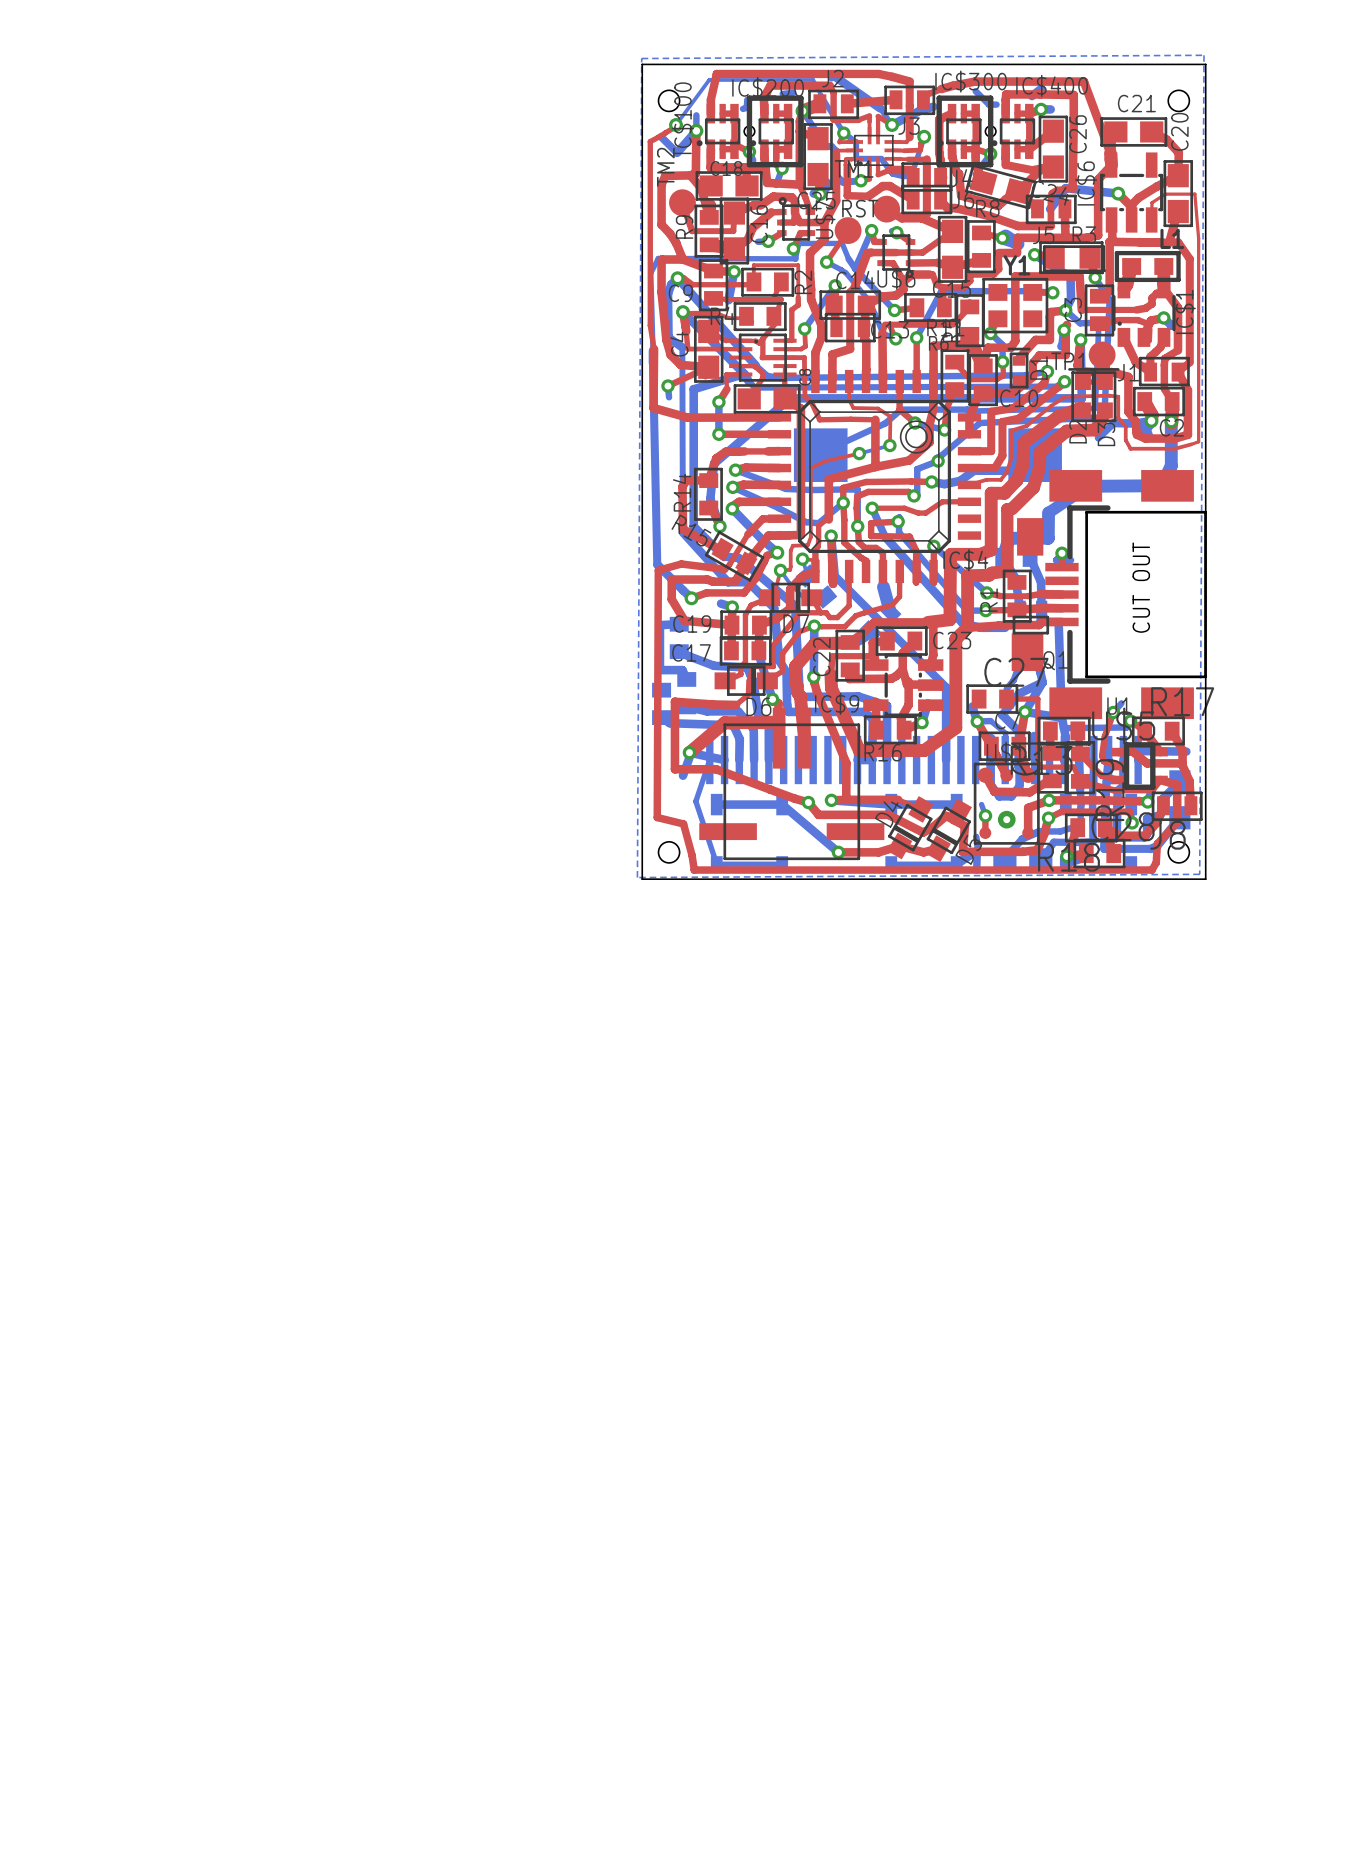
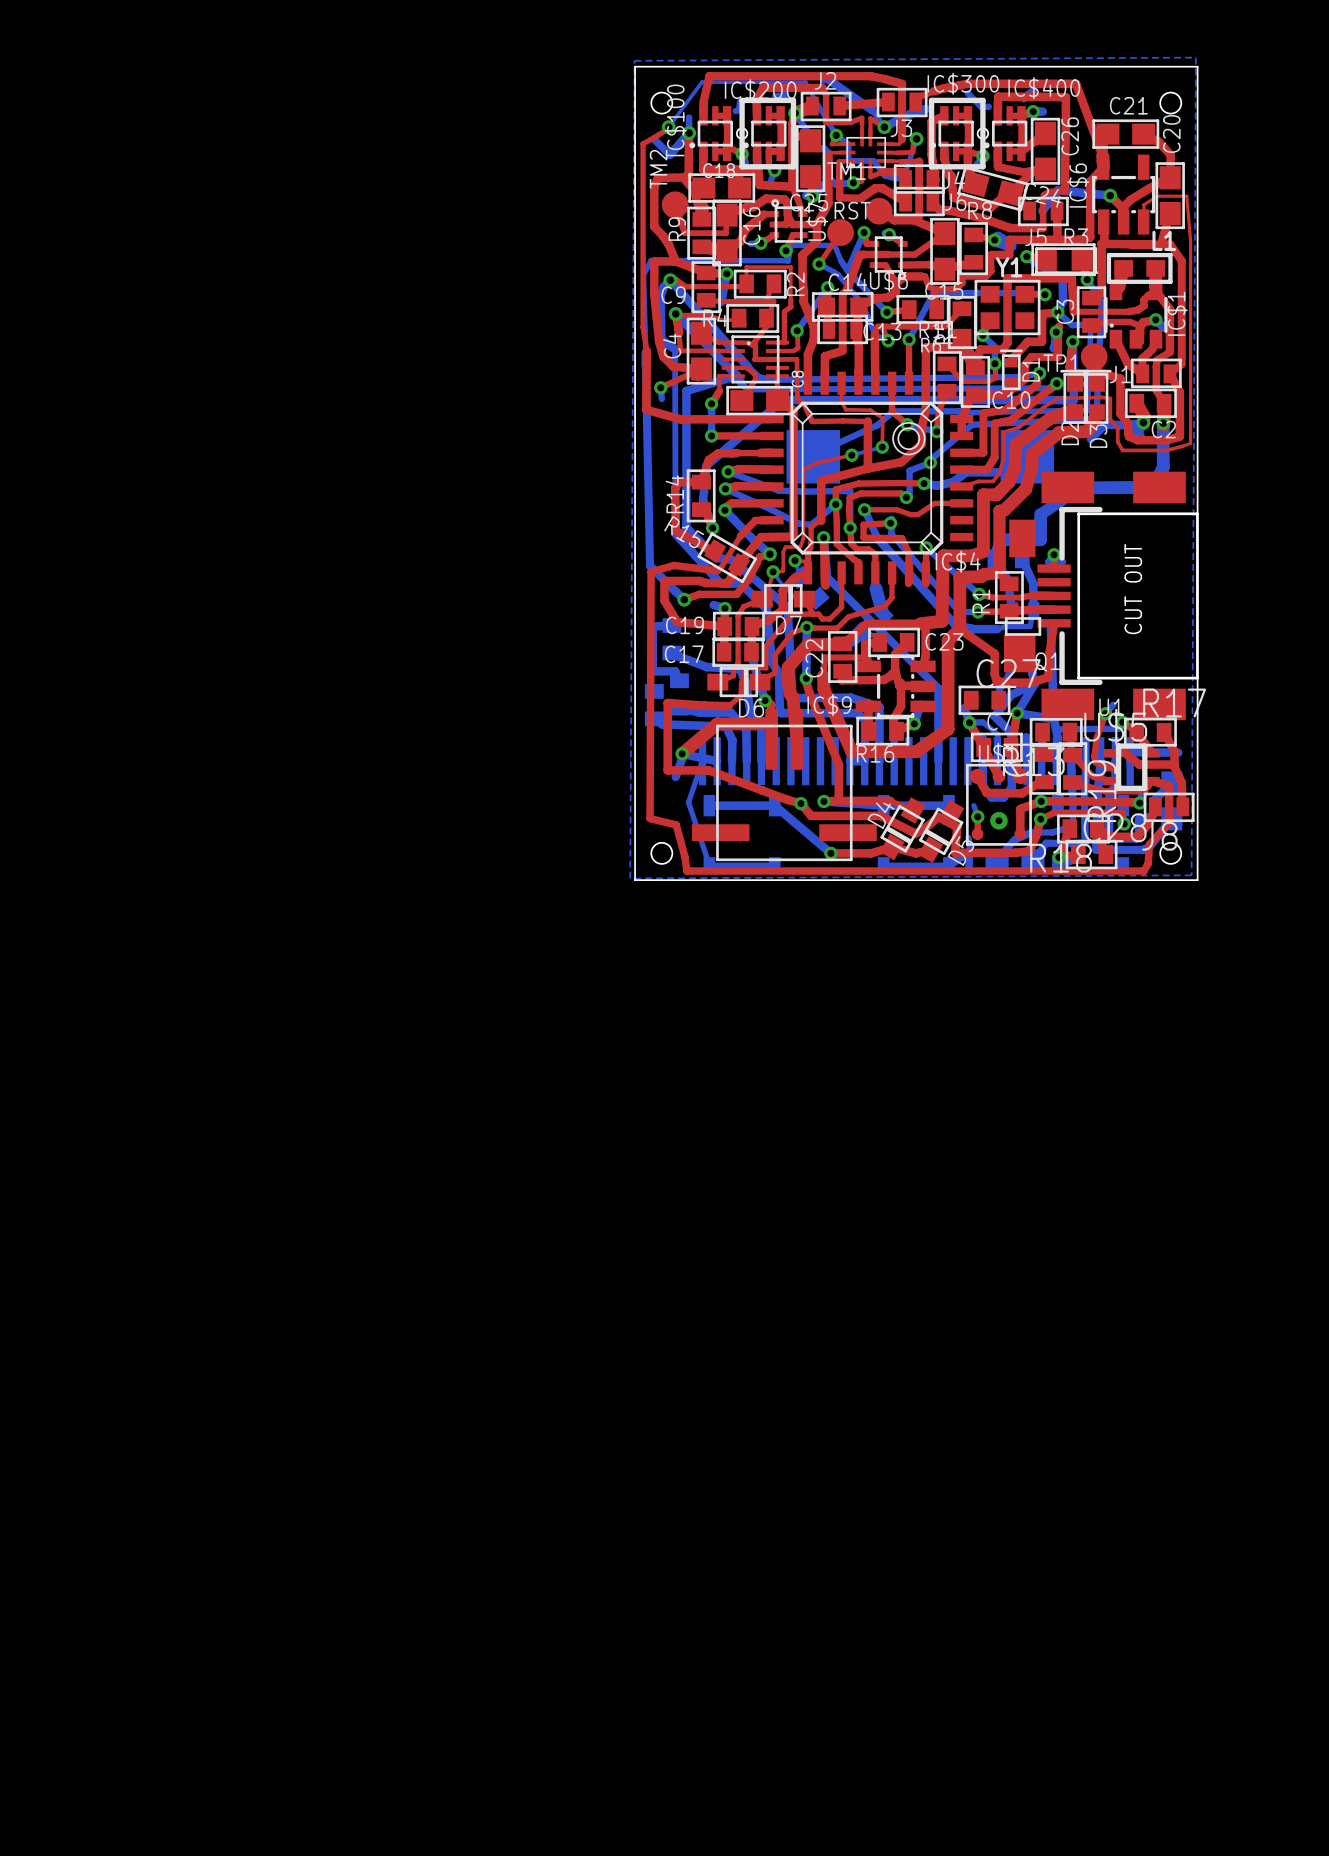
top track: (1061, 621) (1042, 621) (1038, 625) (967, 627) -> (1054, 623) (1048, 677) (1031, 682) (996, 681) (994, 674) (994, 653) (959, 629)
top track: (1006, 699) (1037, 699) (1037, 763) (1040, 767) (1073, 767) (1080, 781) -> none

